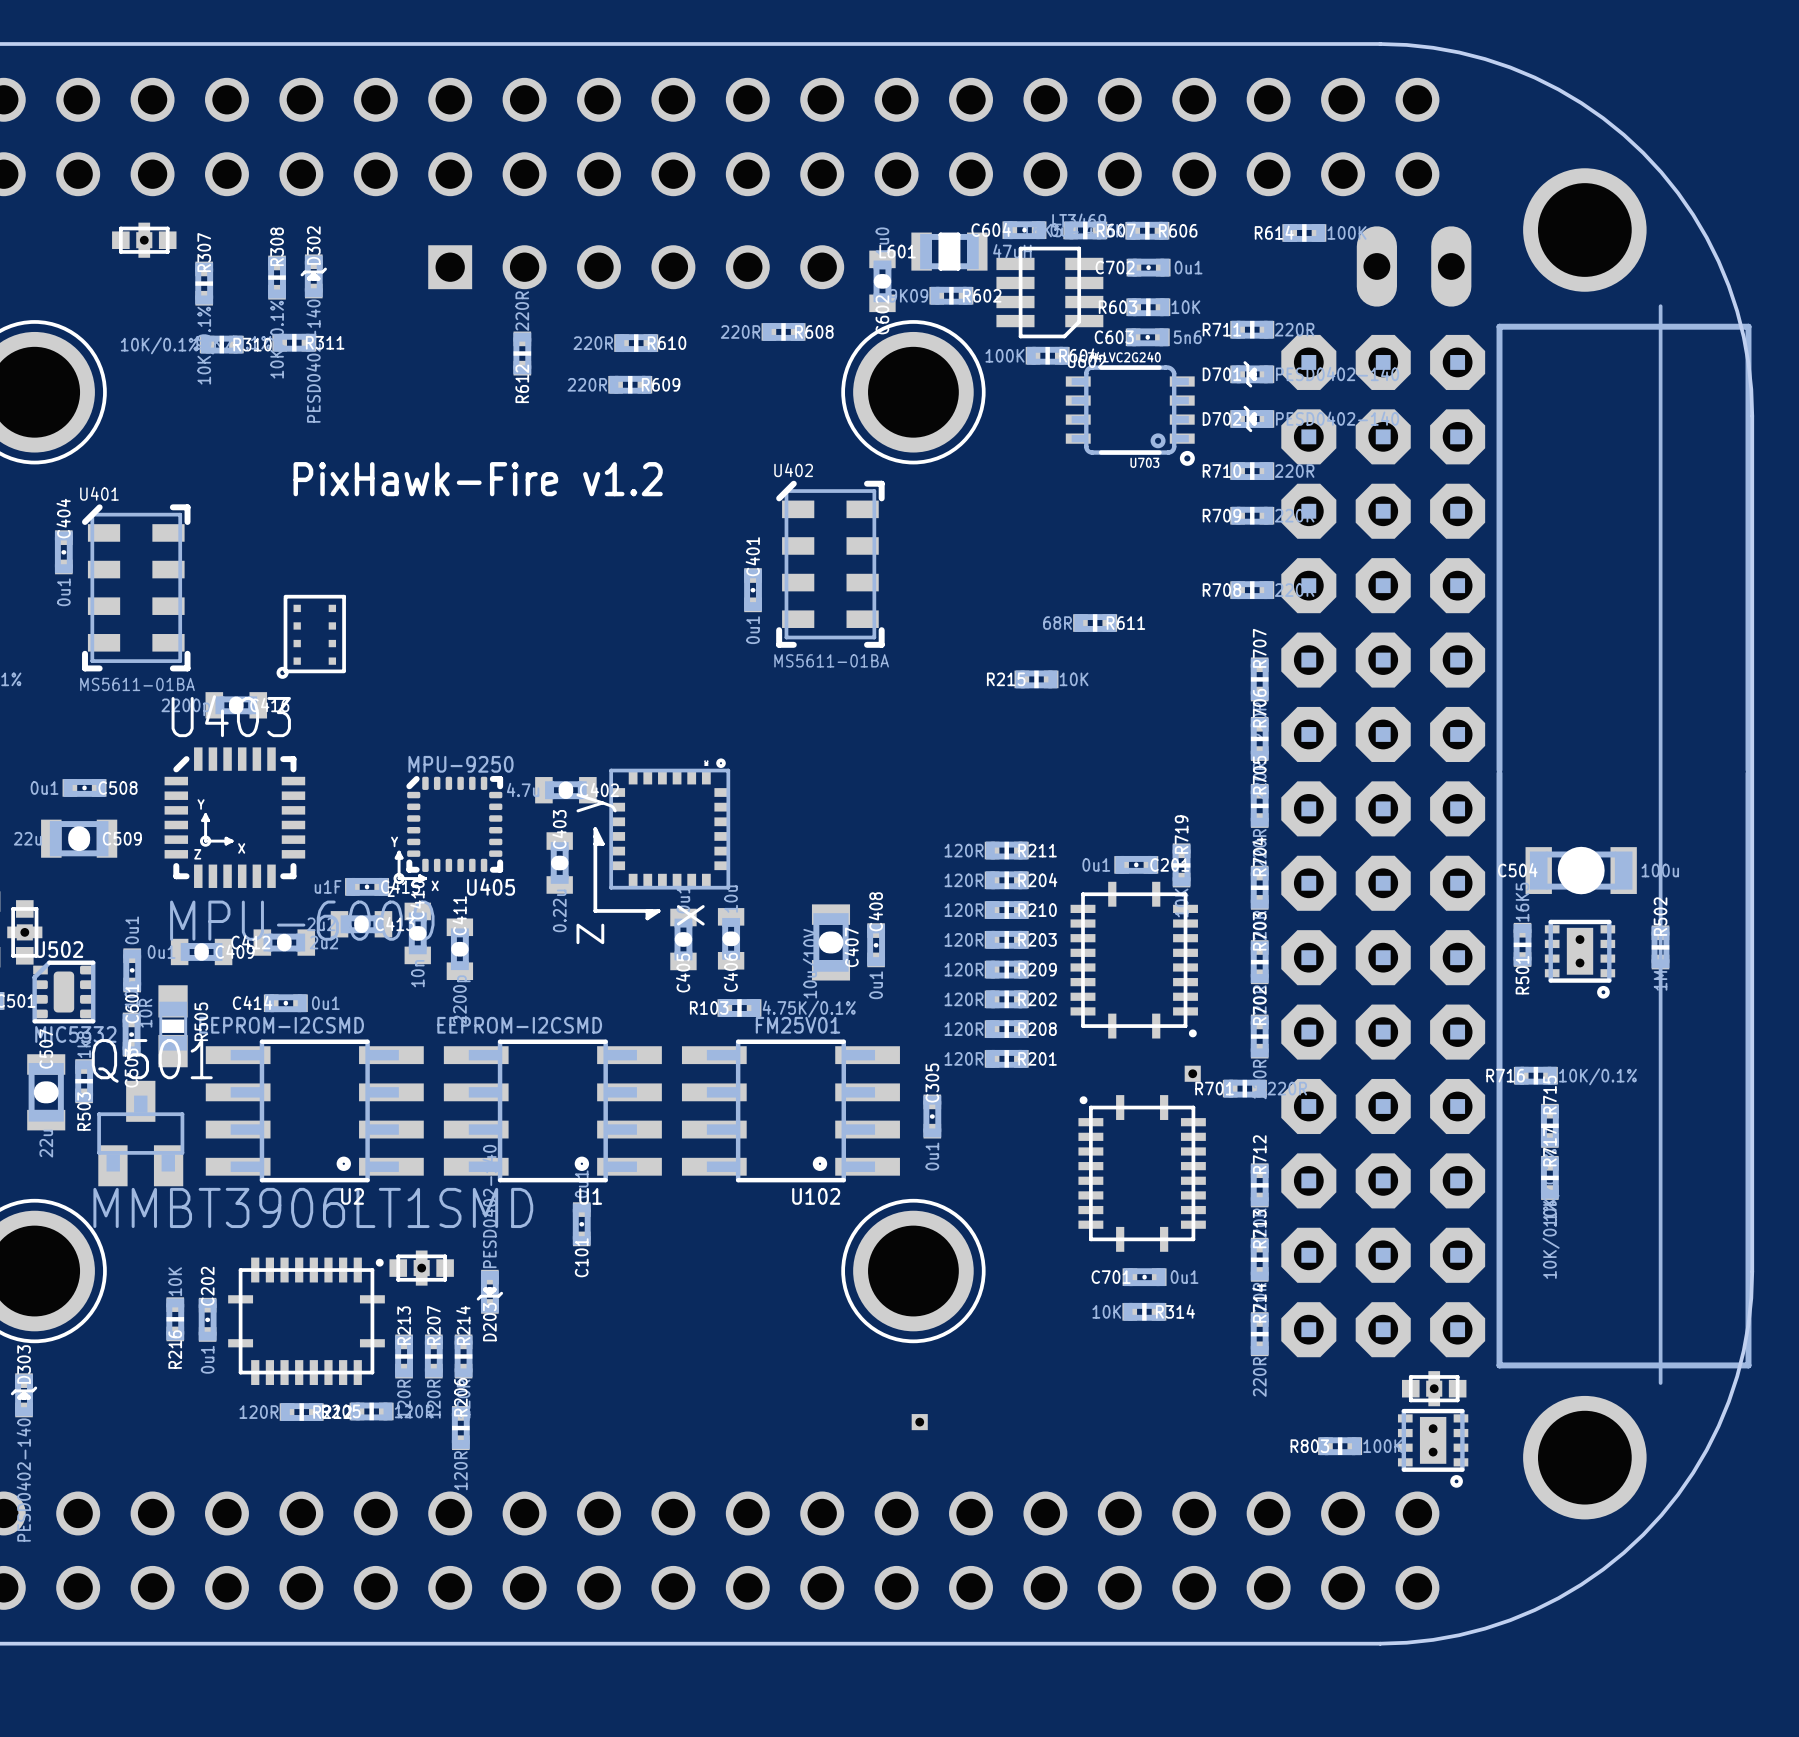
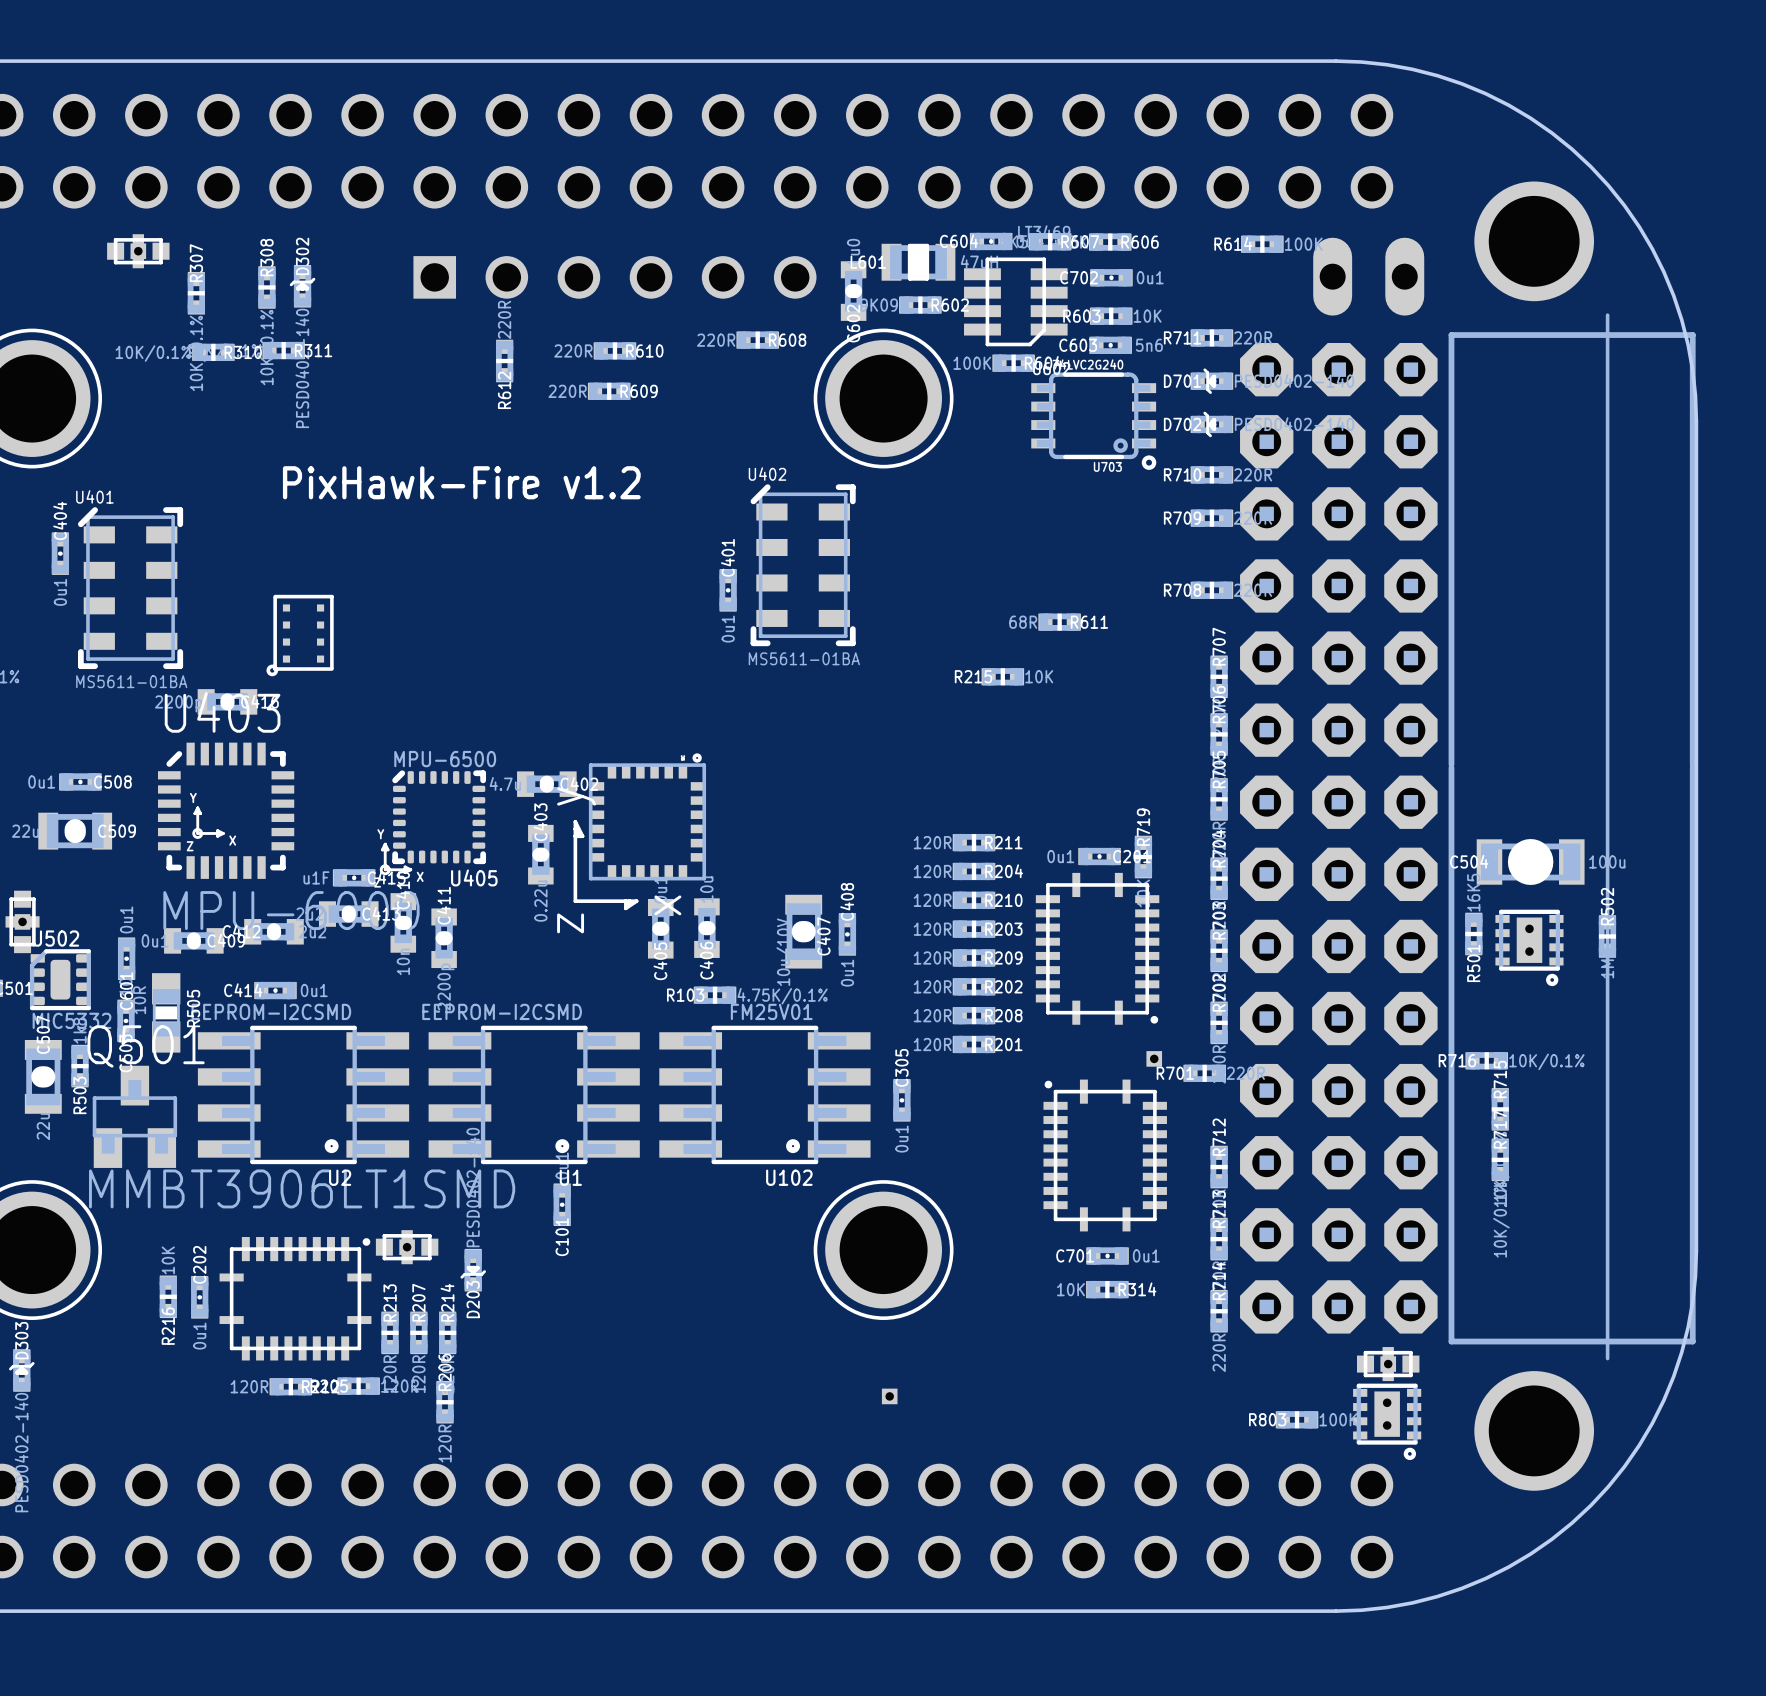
U405 value: MPU-9250 (461, 764) -> MPU-6500 (445, 759)

